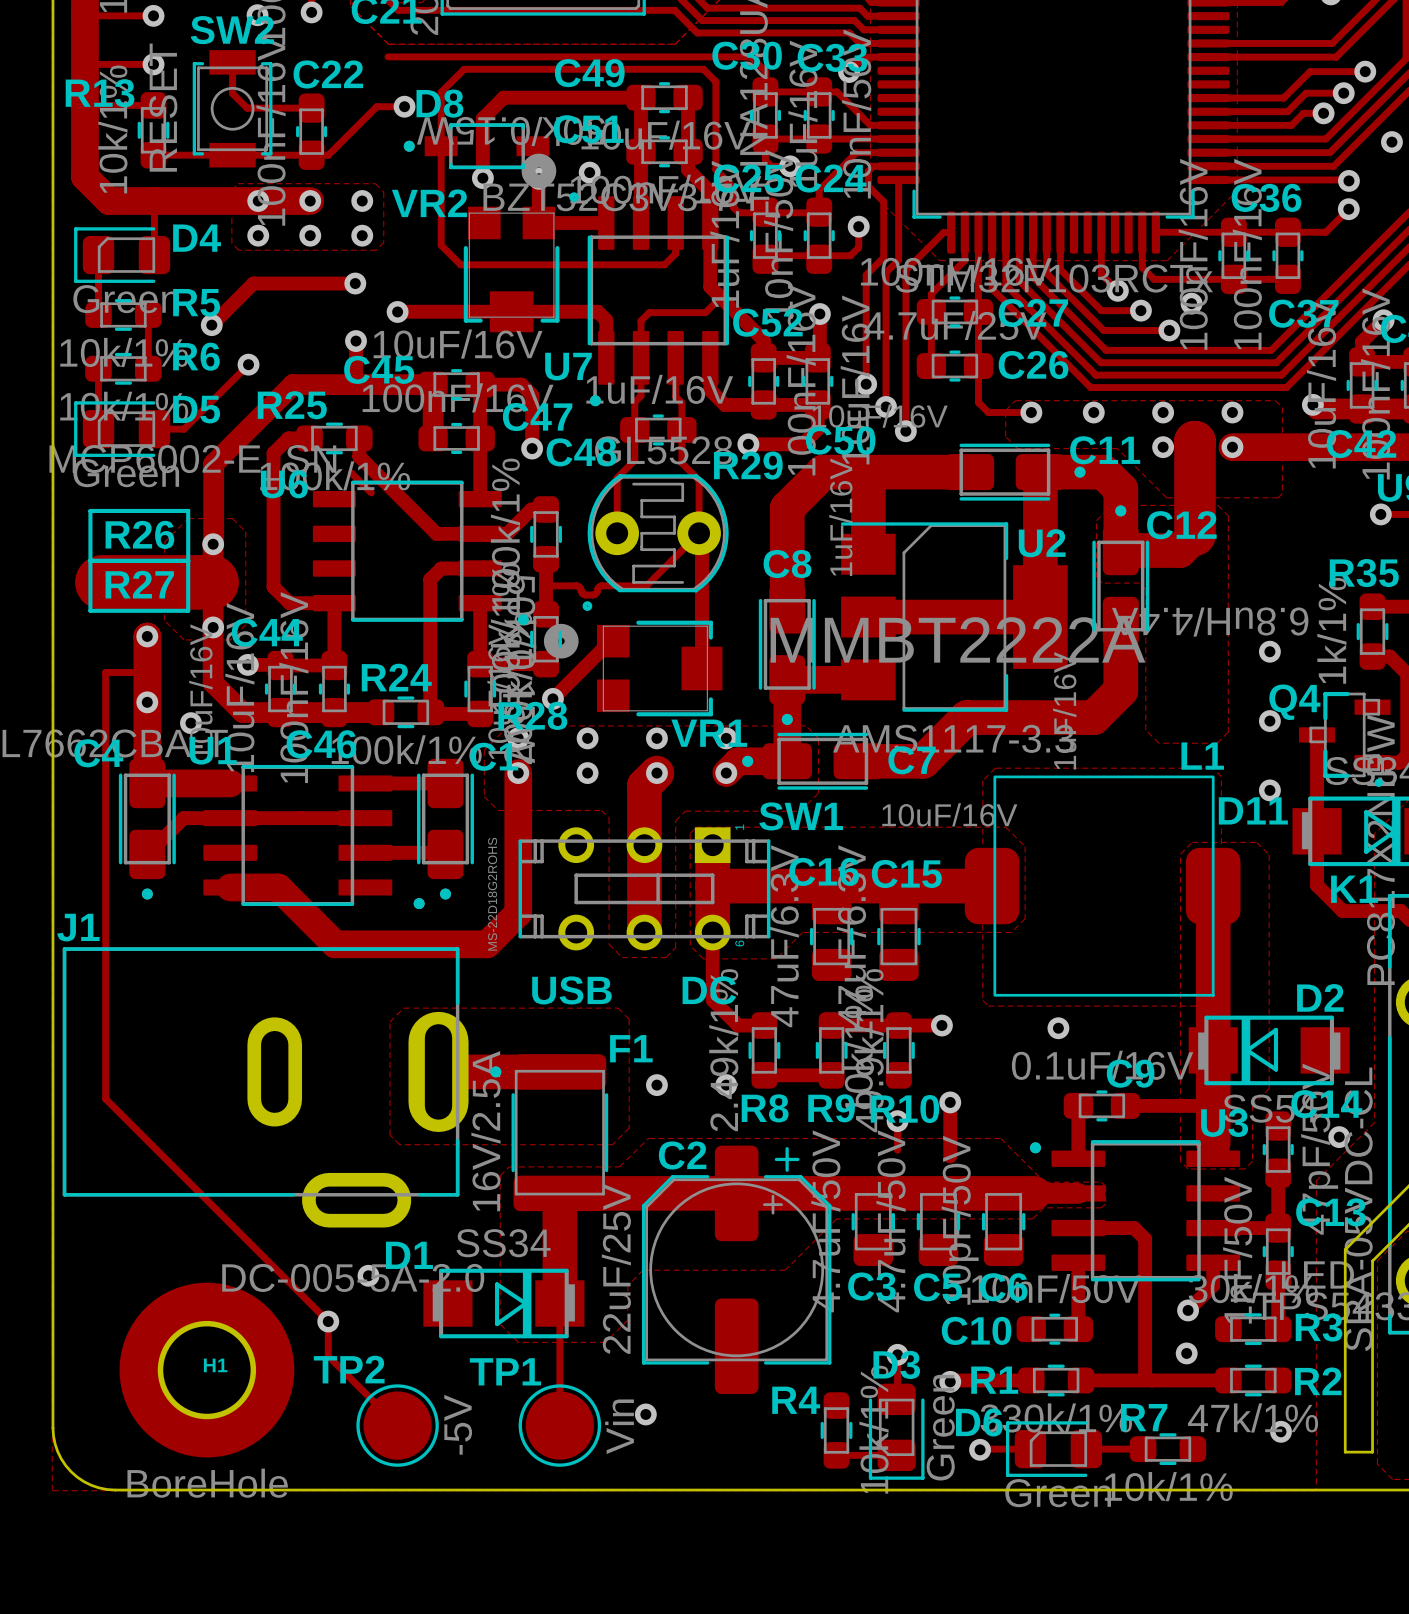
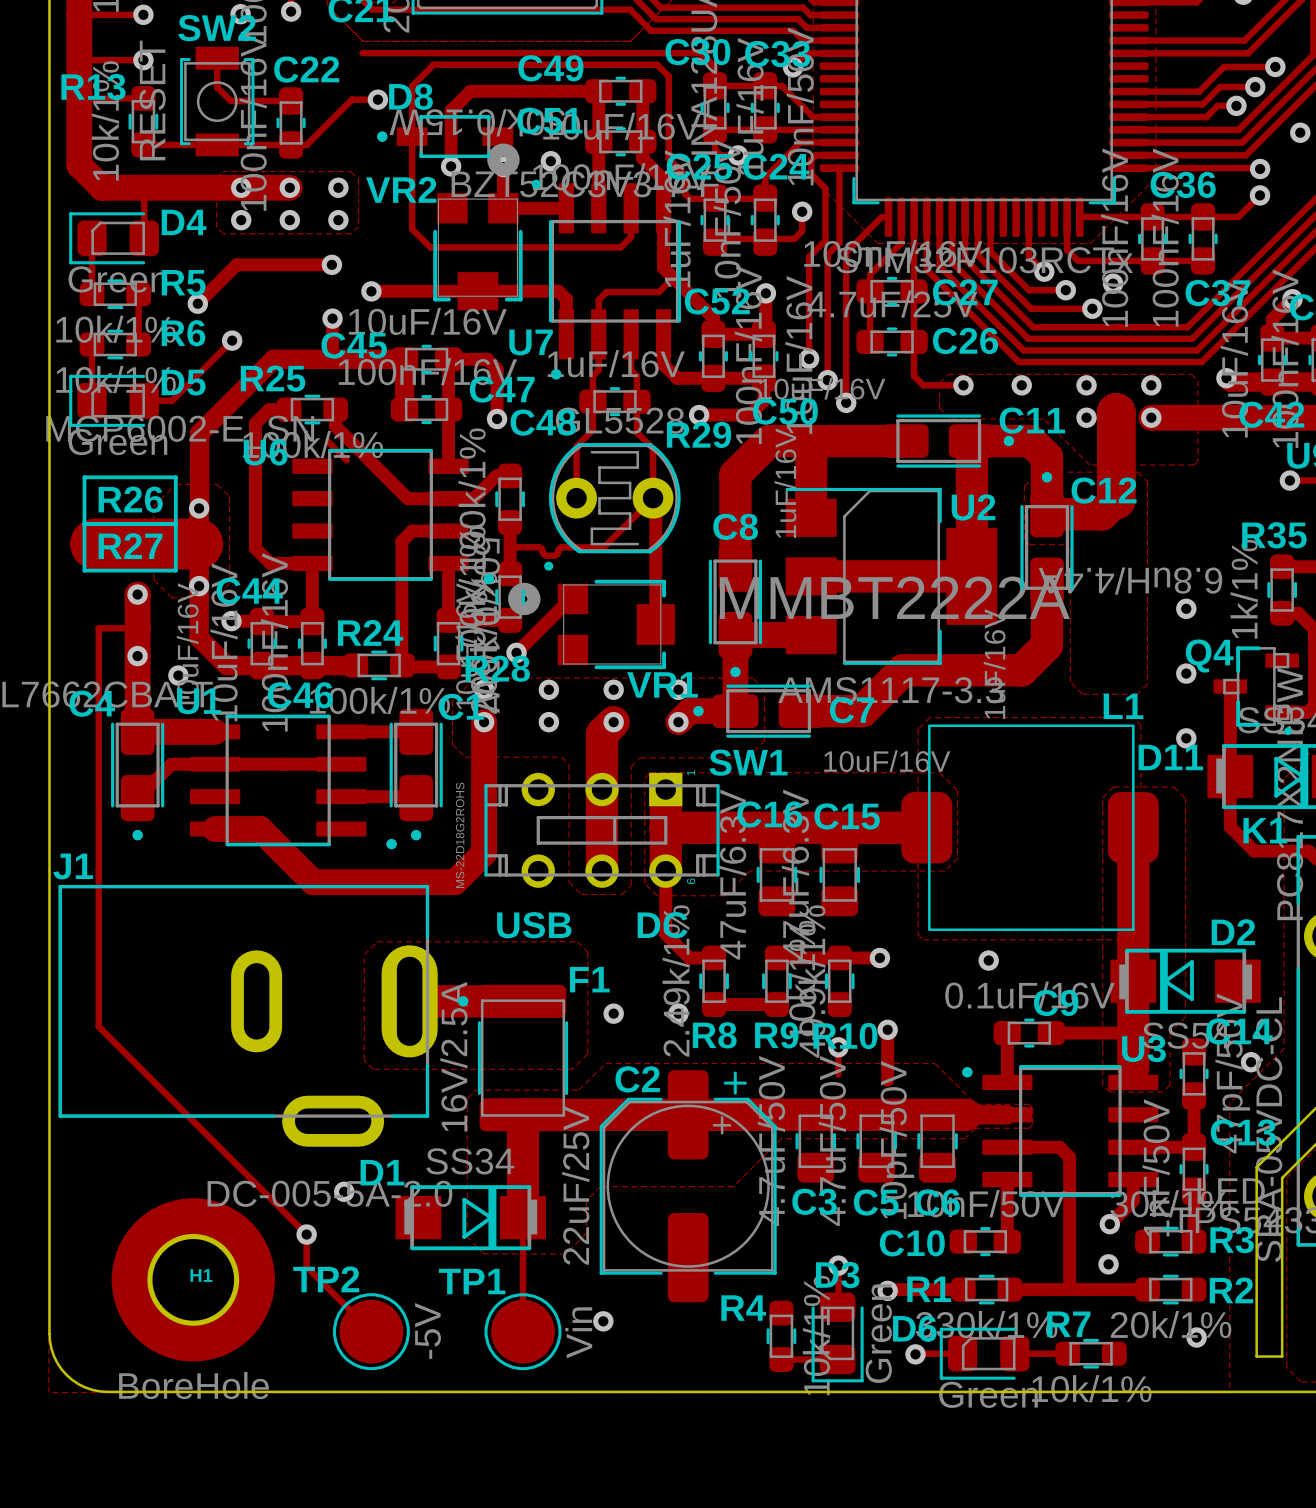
R2 value: 47k/1% (1253, 1417) -> 20k/1% (1171, 1324)

